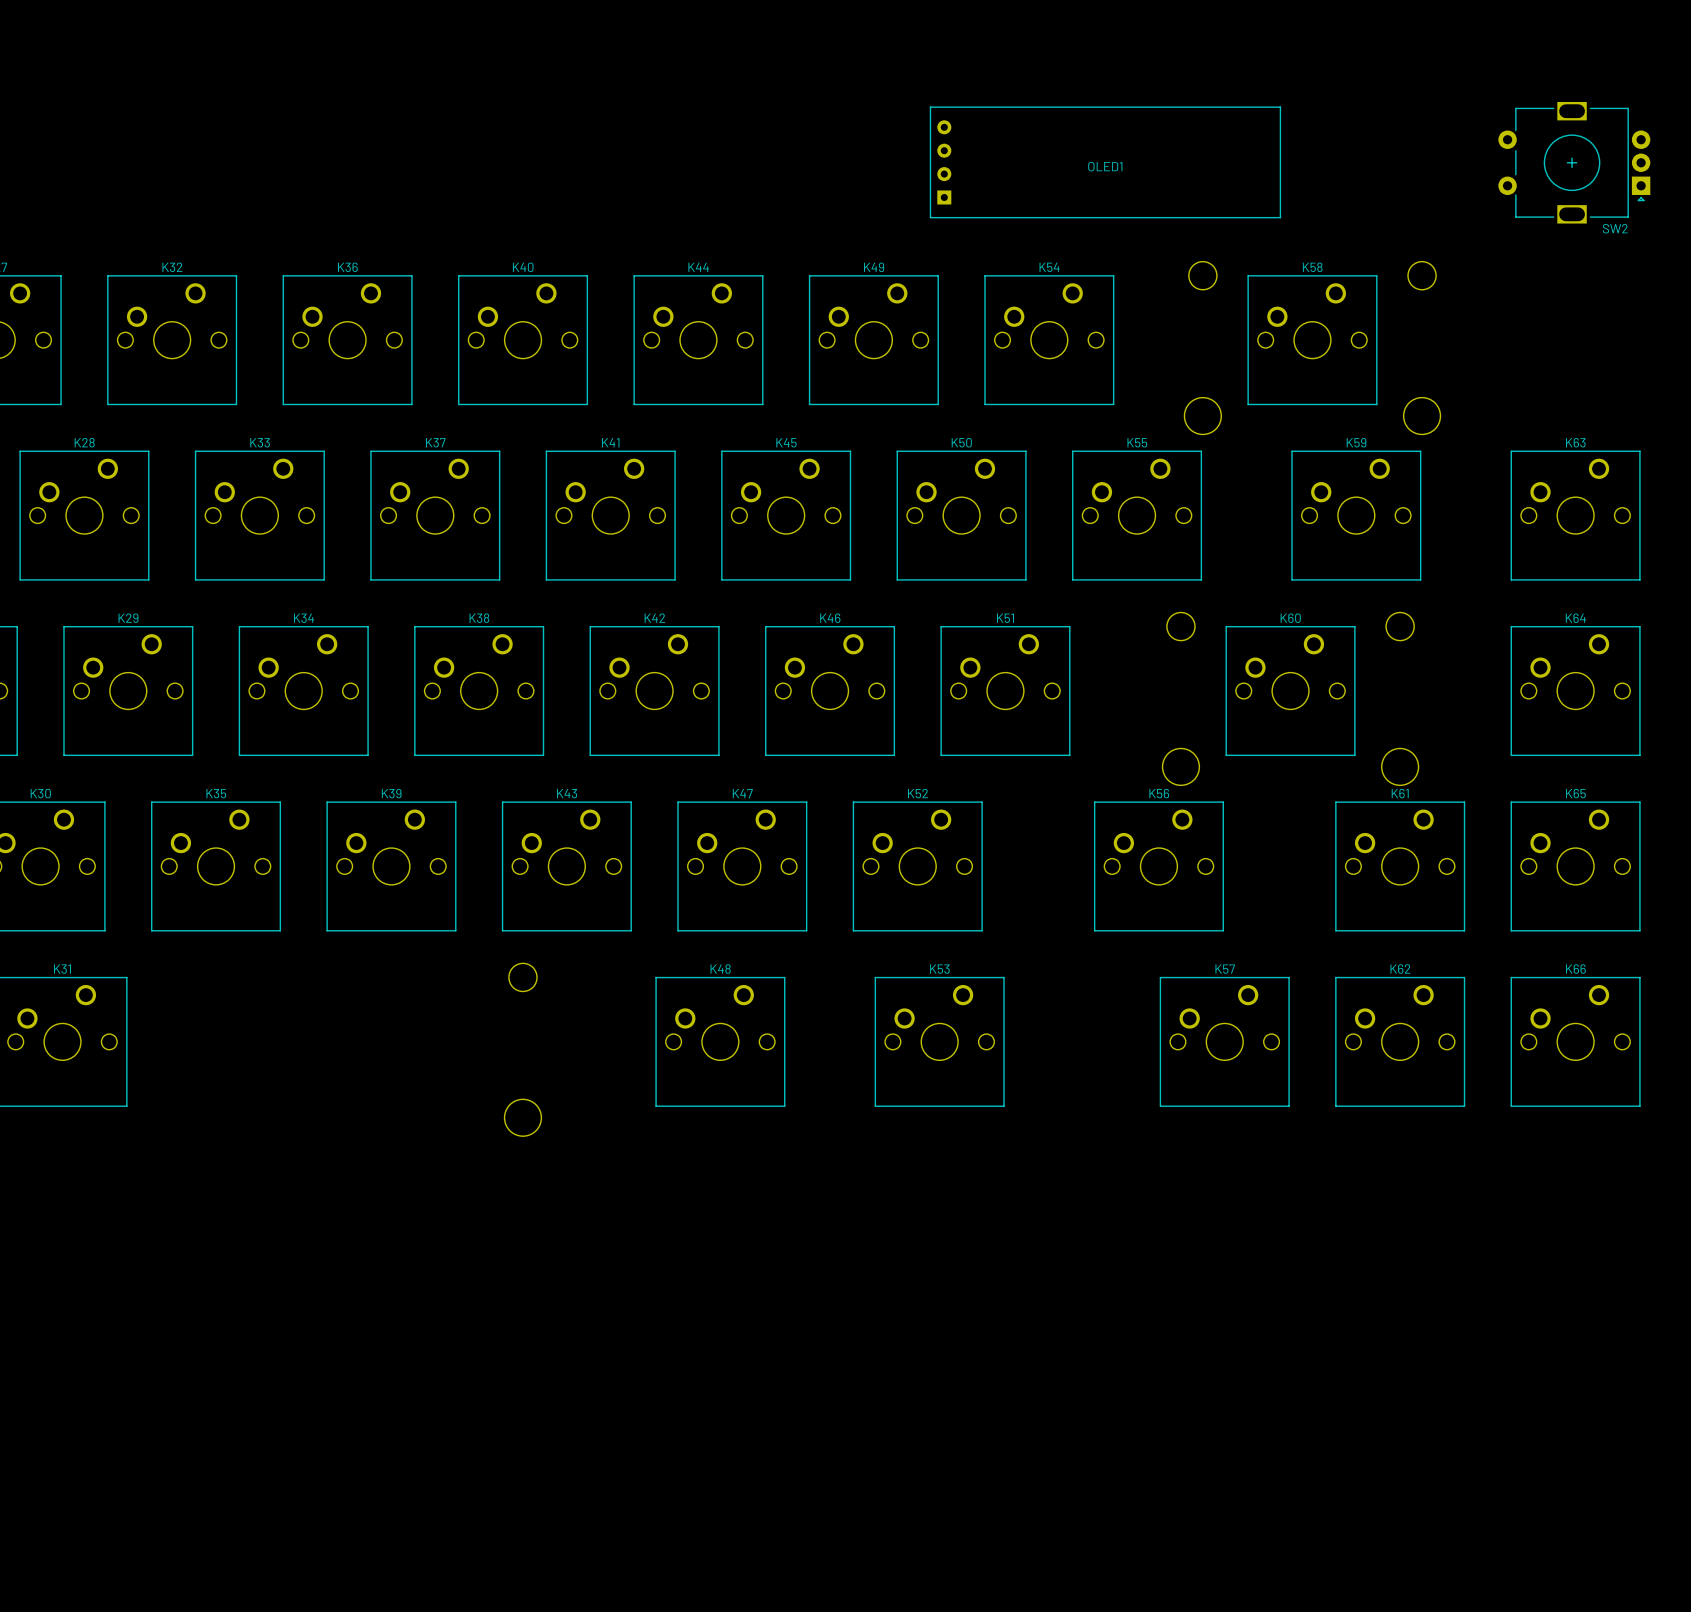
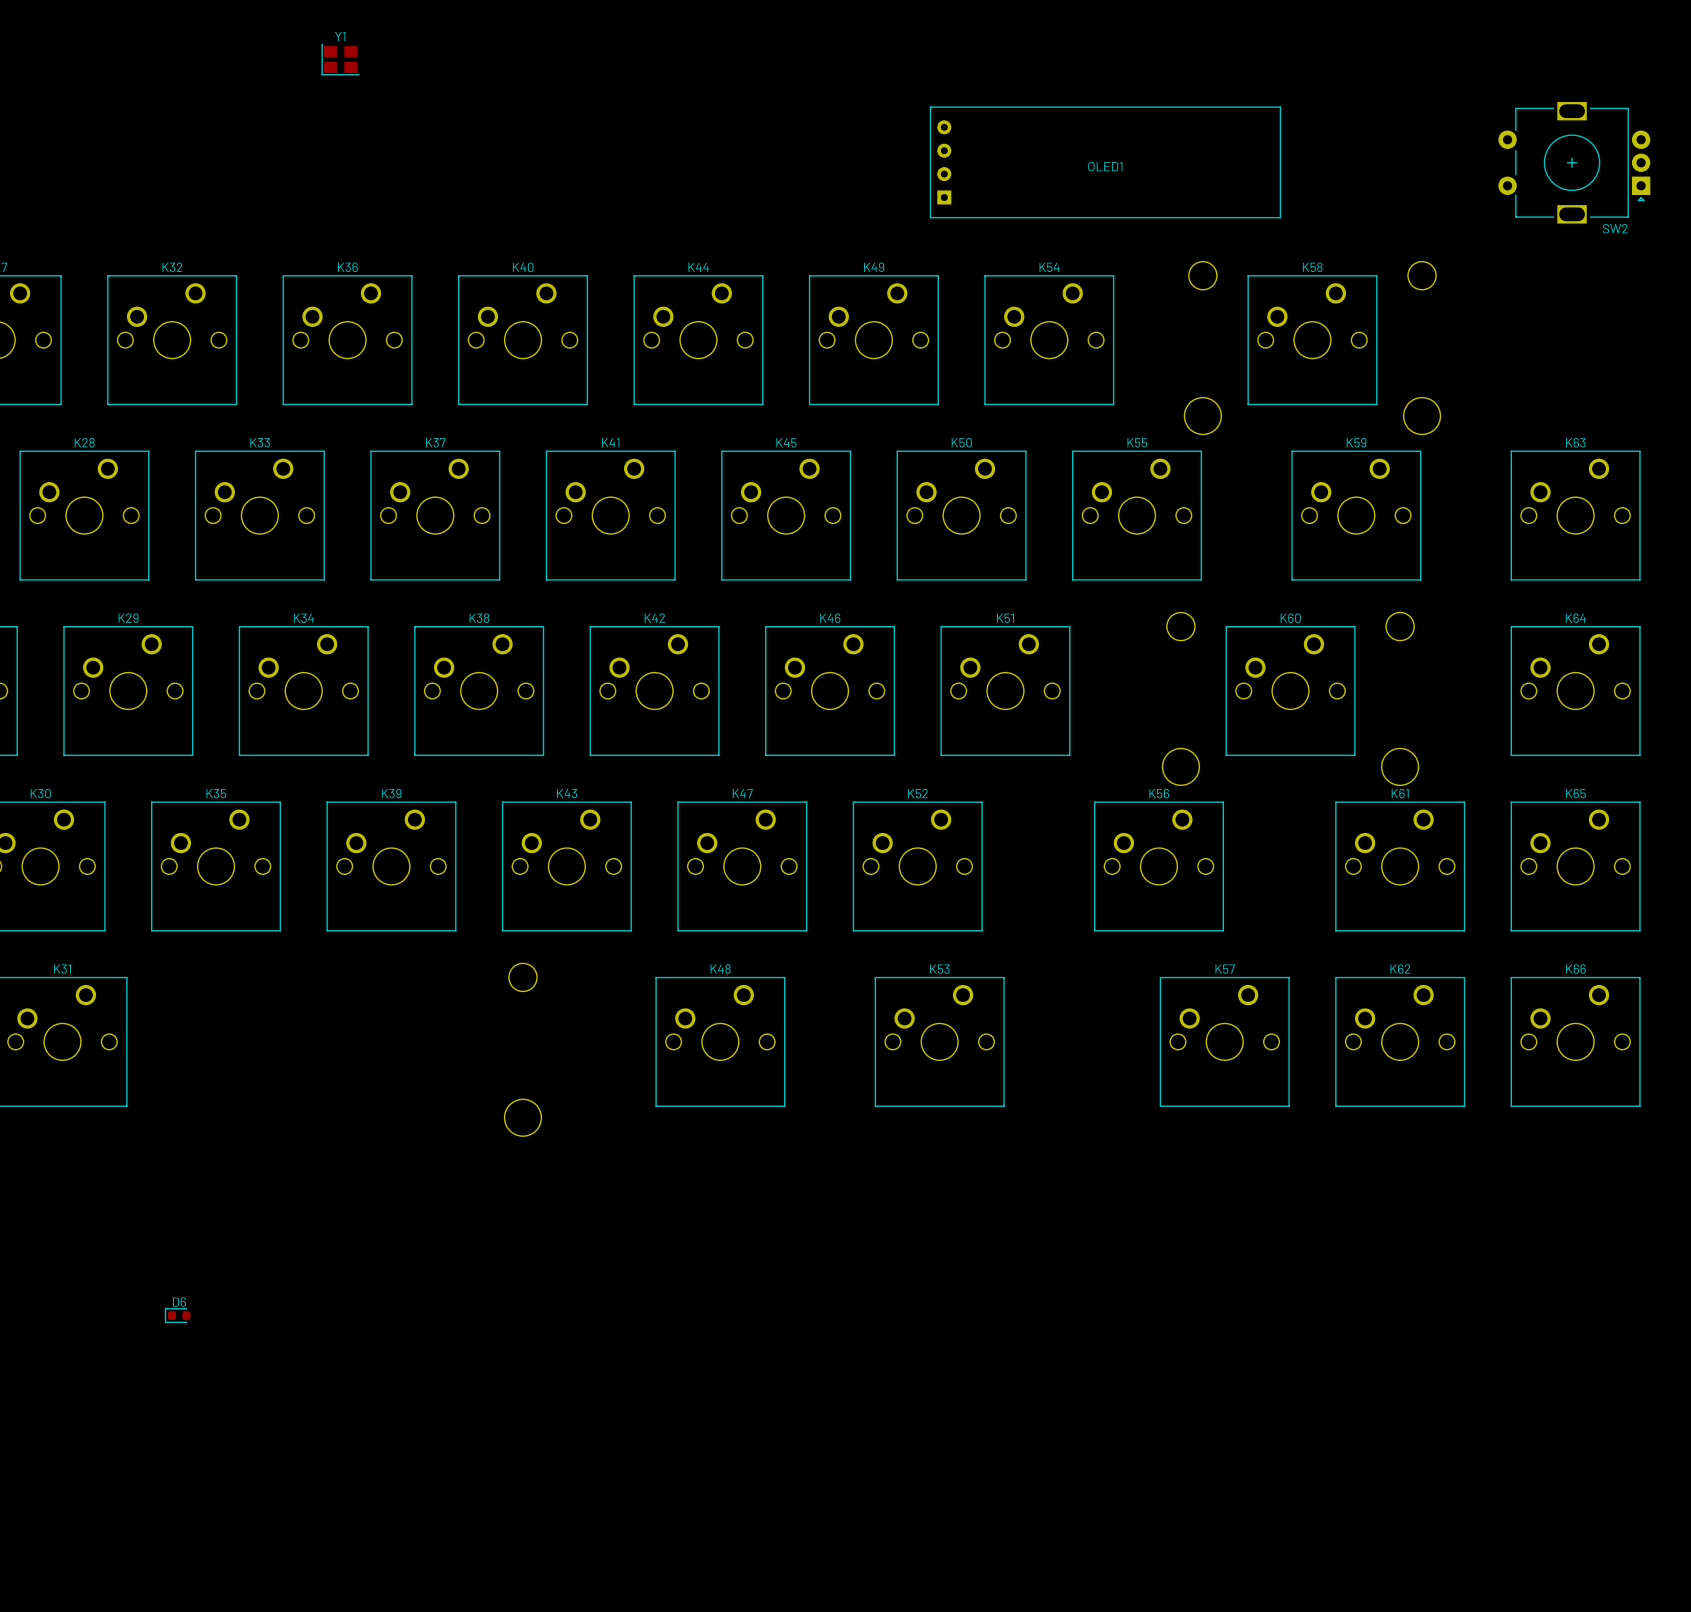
Y1: none -> (340, 59)
D6: none -> (177, 1315)

